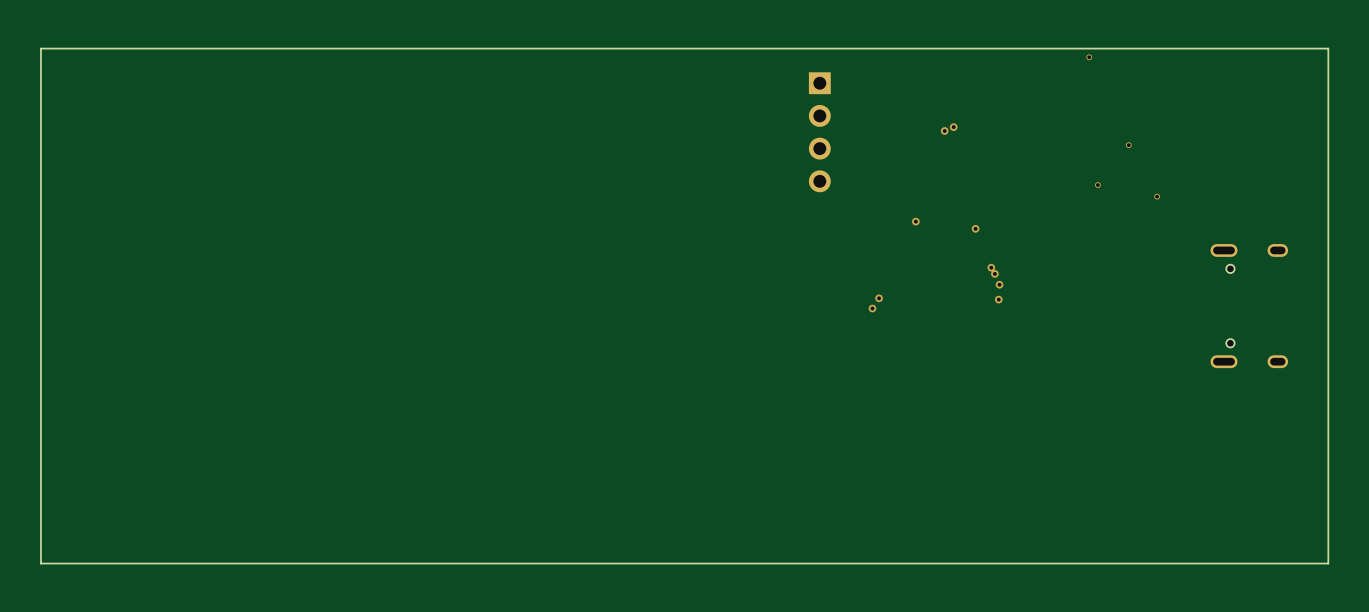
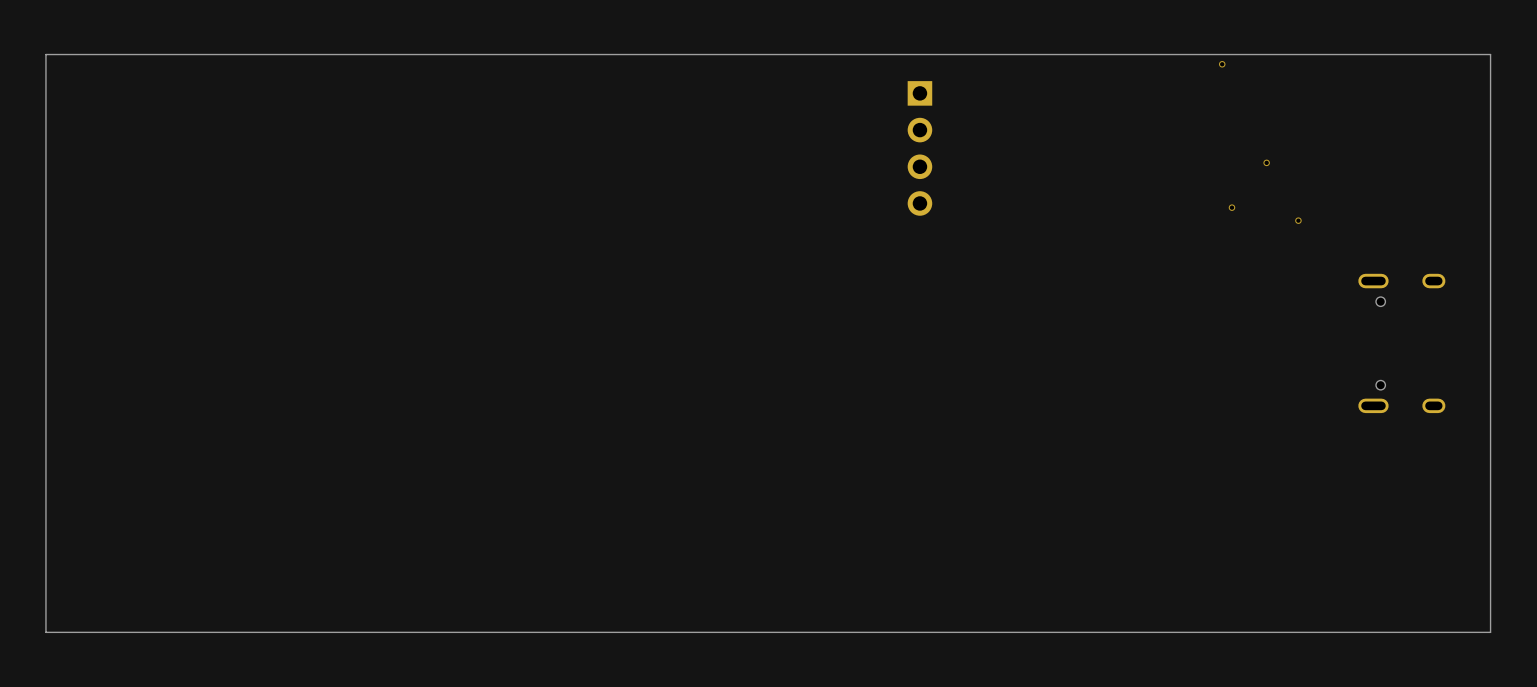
via: (953, 127) -> none
via: (944, 130) -> none
via: (915, 221) -> none
via: (975, 228) -> none
via: (991, 267) -> none
via: (994, 273) -> none
via: (999, 284) -> none
via: (879, 298) -> none
via: (998, 299) -> none
via: (872, 308) -> none

